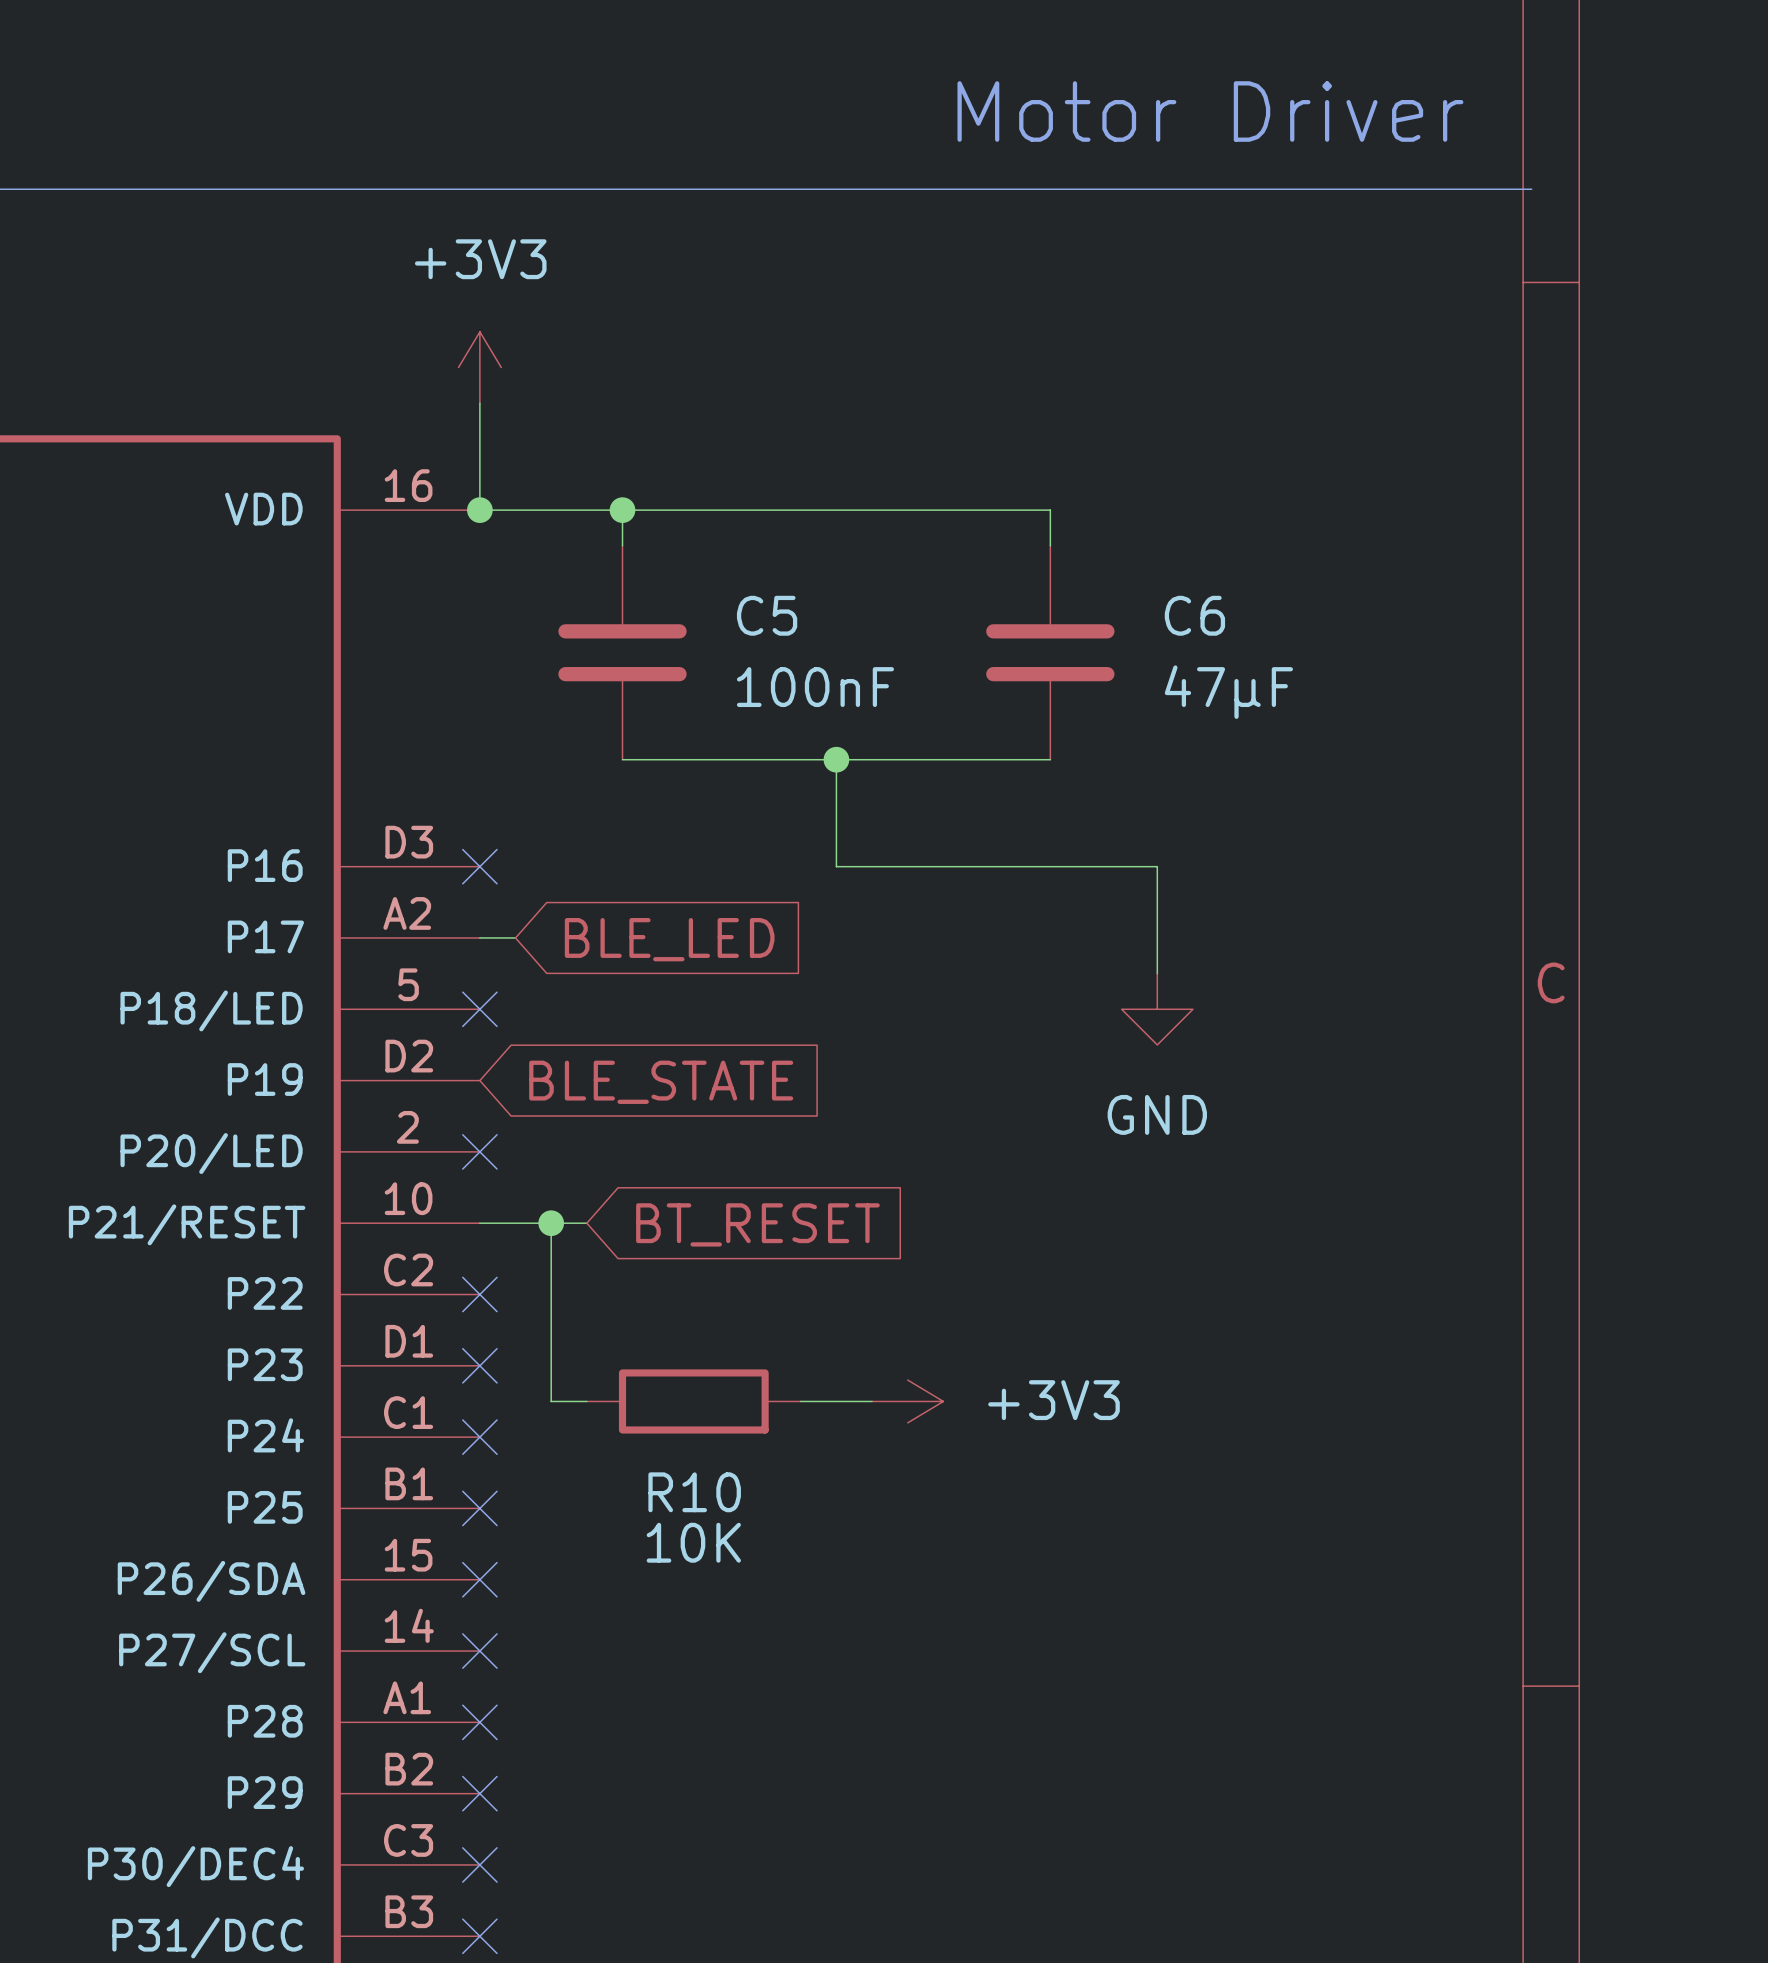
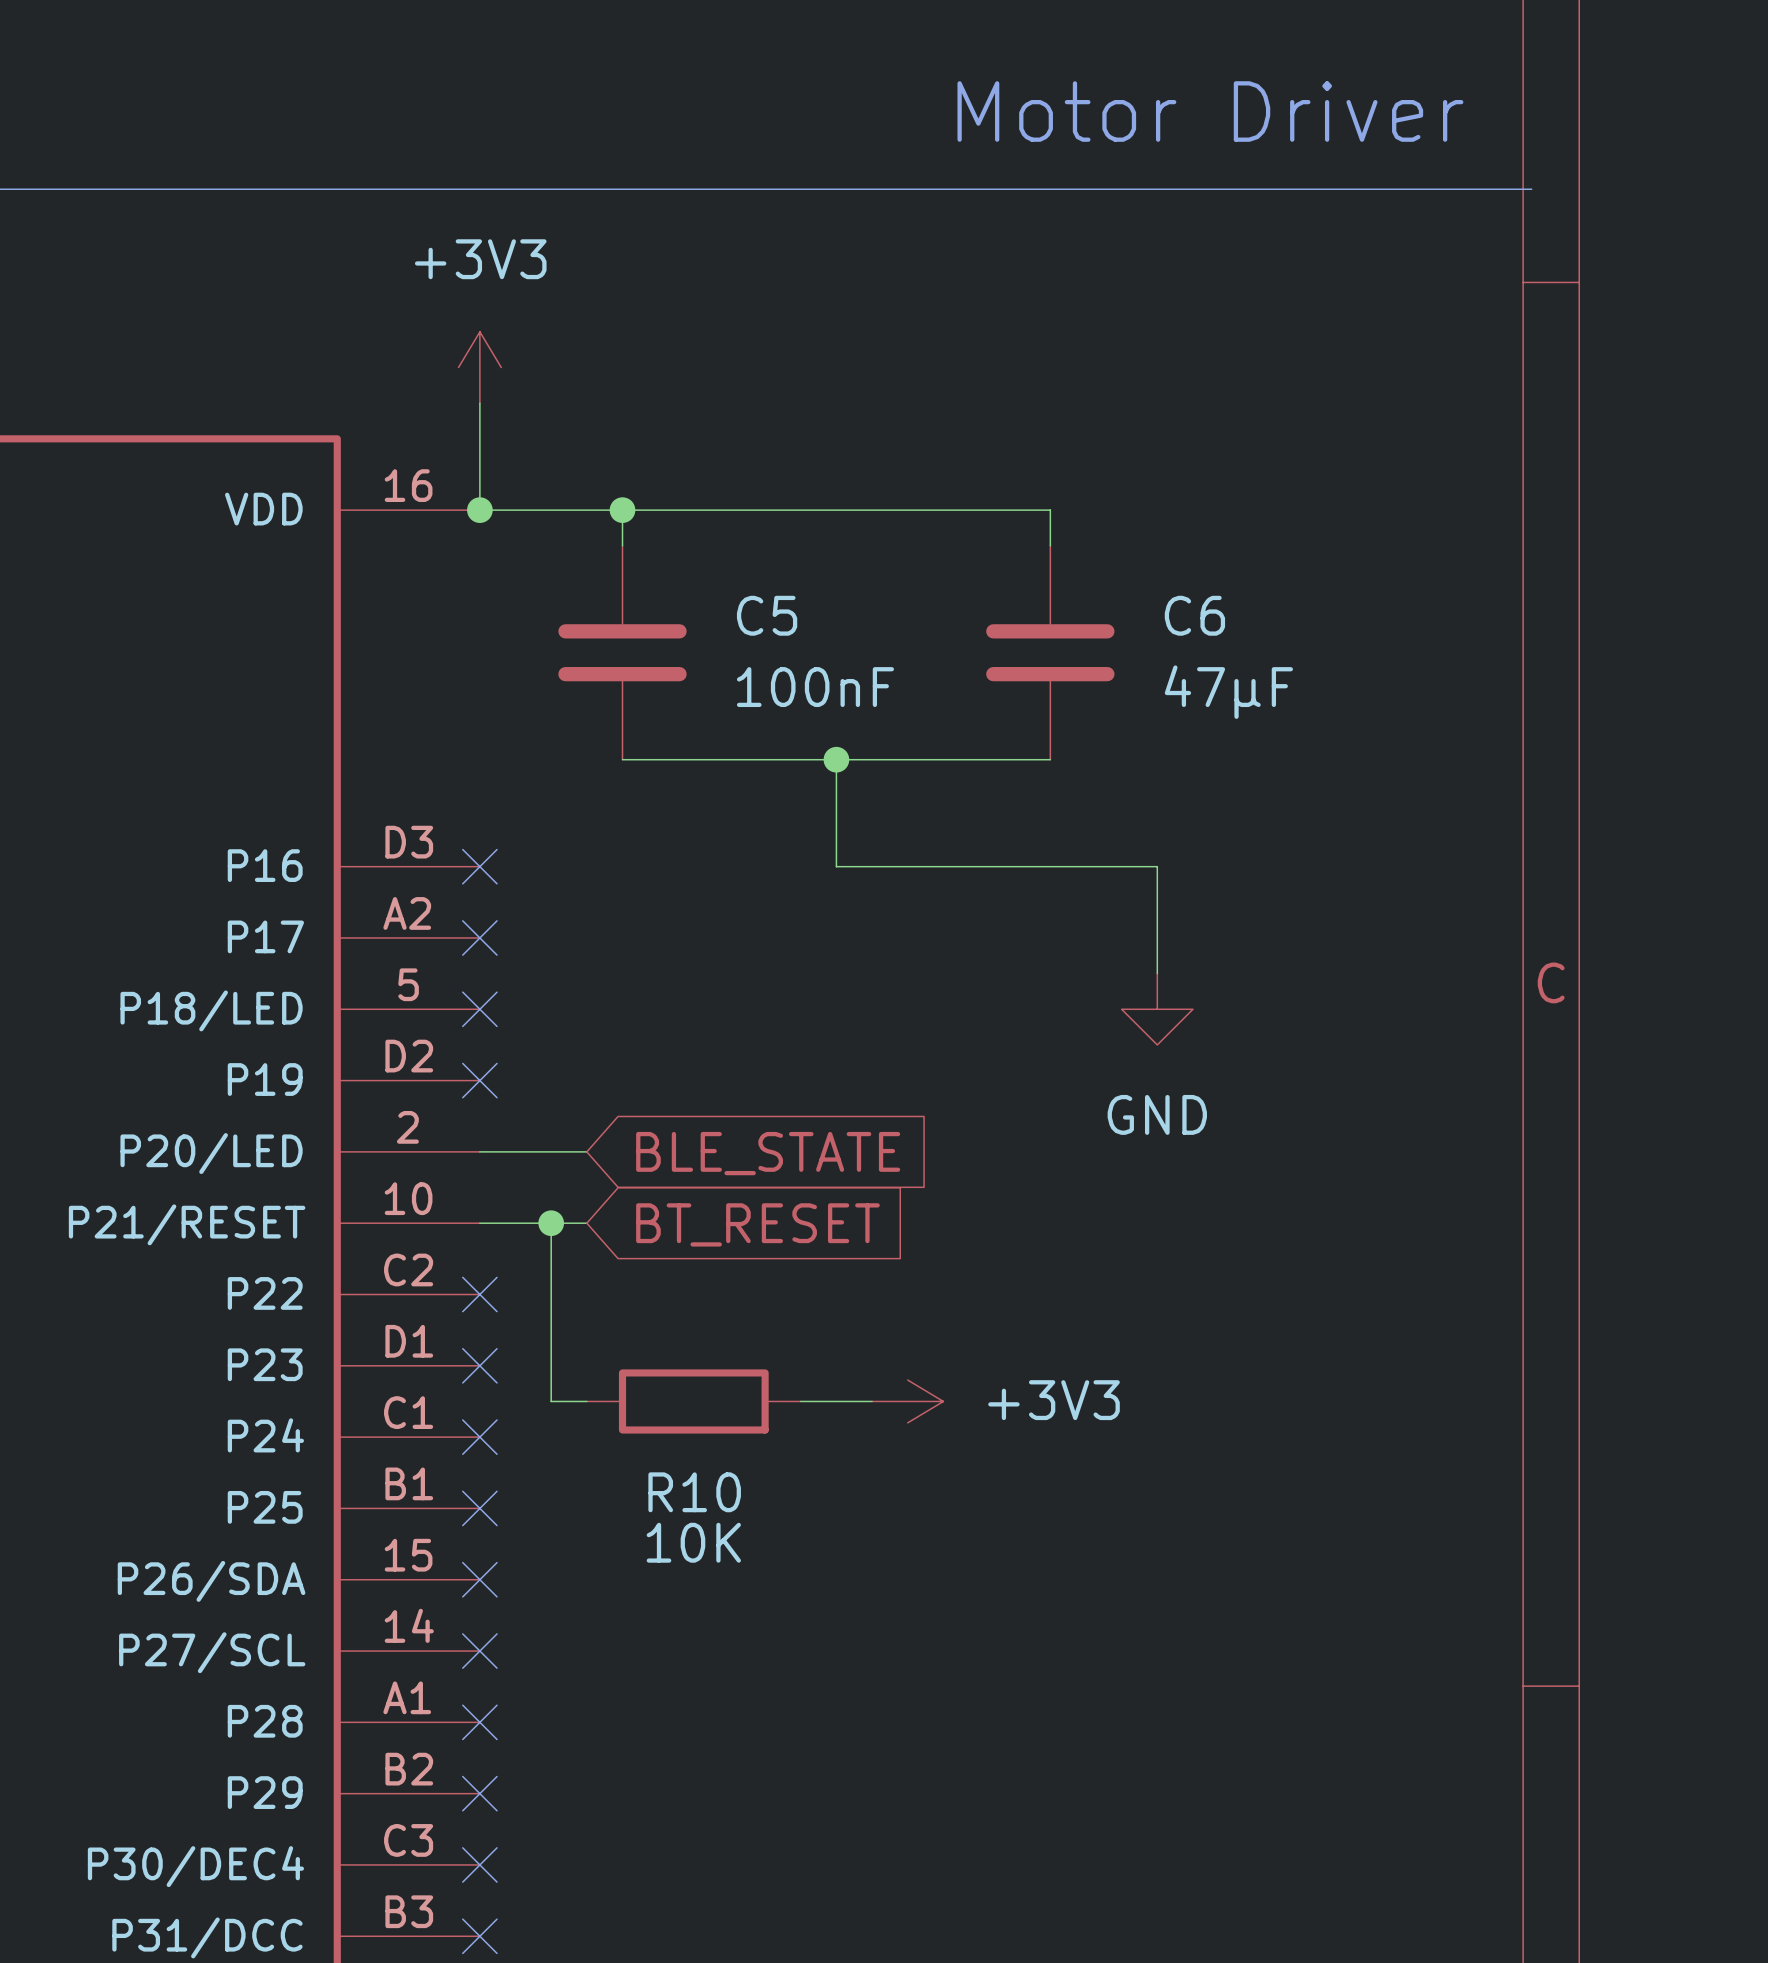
wire: (479, 937) (515, 937) -> none
no-connect mark: none -> (479, 937)
global label: BLE_LED (669, 939) -> none
global label position: BLE_STATE (661, 1082) -> BLE_STATE (768, 1153)
wire: none -> (479, 1151) (586, 1151)
no-connect mark position: (479, 1151) -> (479, 1080)

